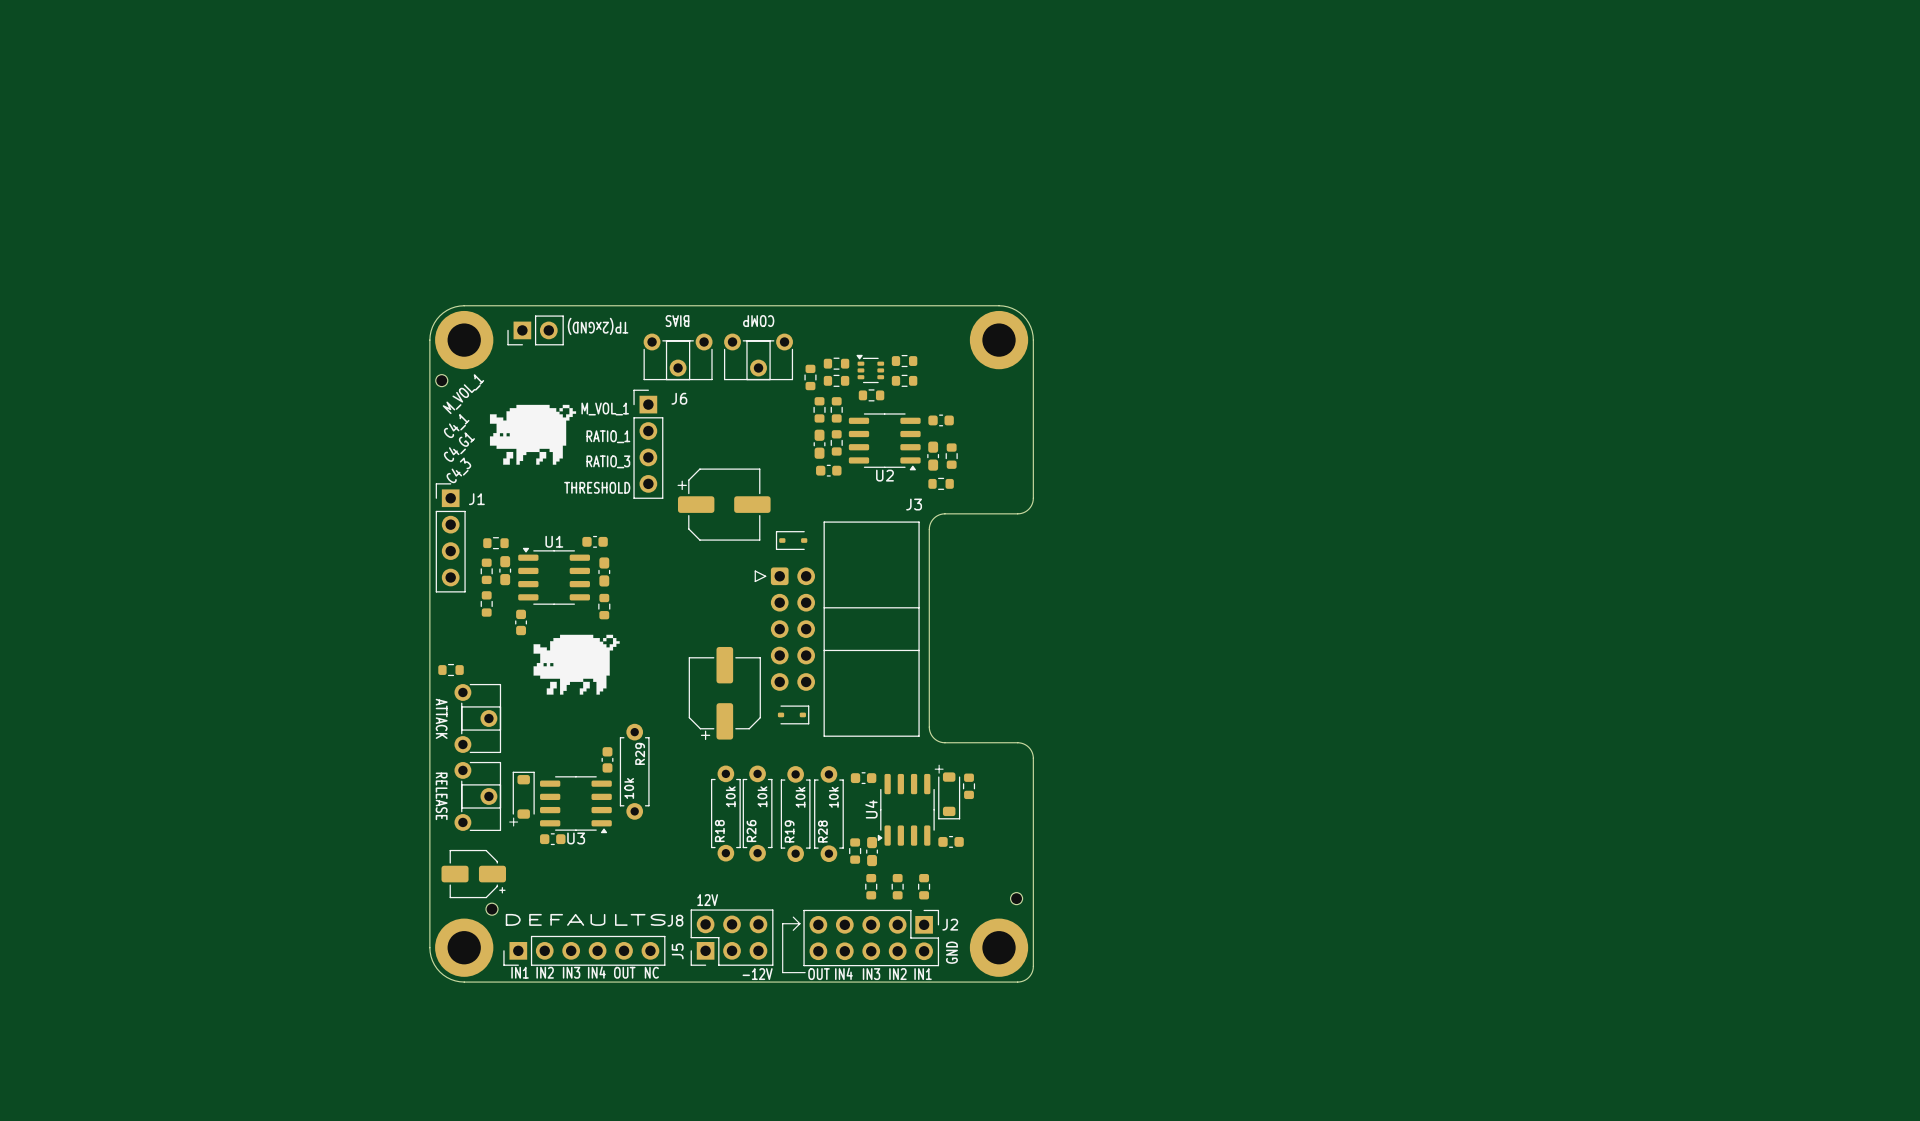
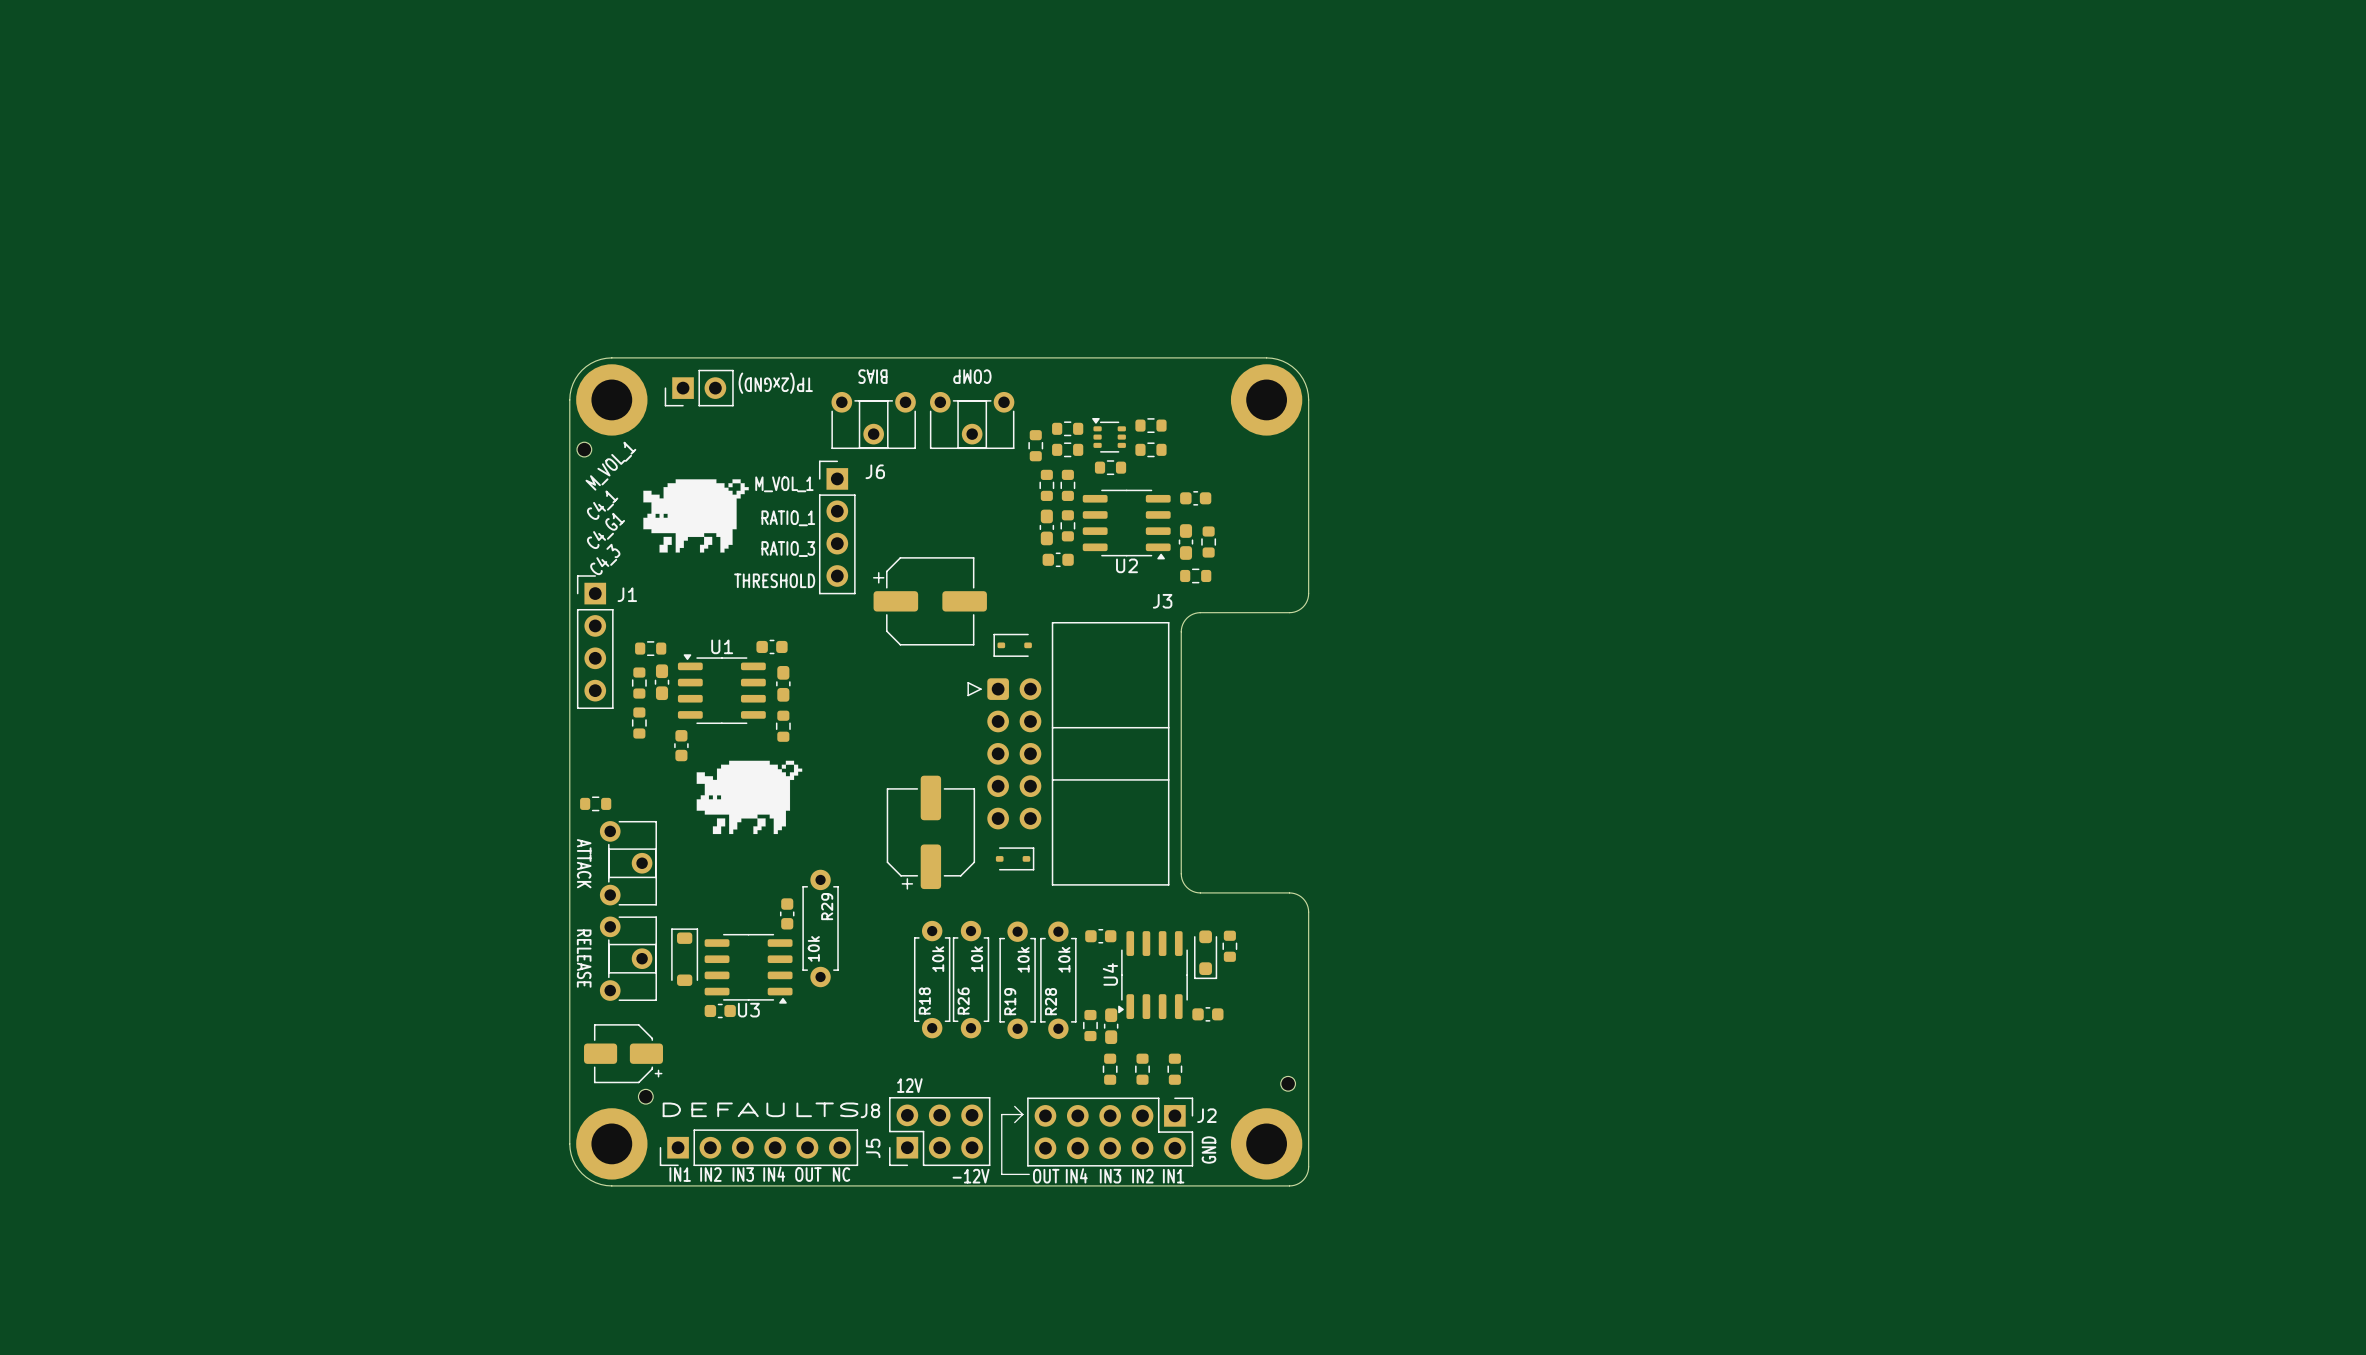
text: + (939, 769) -> none
part footprint: [938, 772, 961, 820] -> [1194, 930, 1218, 980]
text: + (513, 822) -> none

